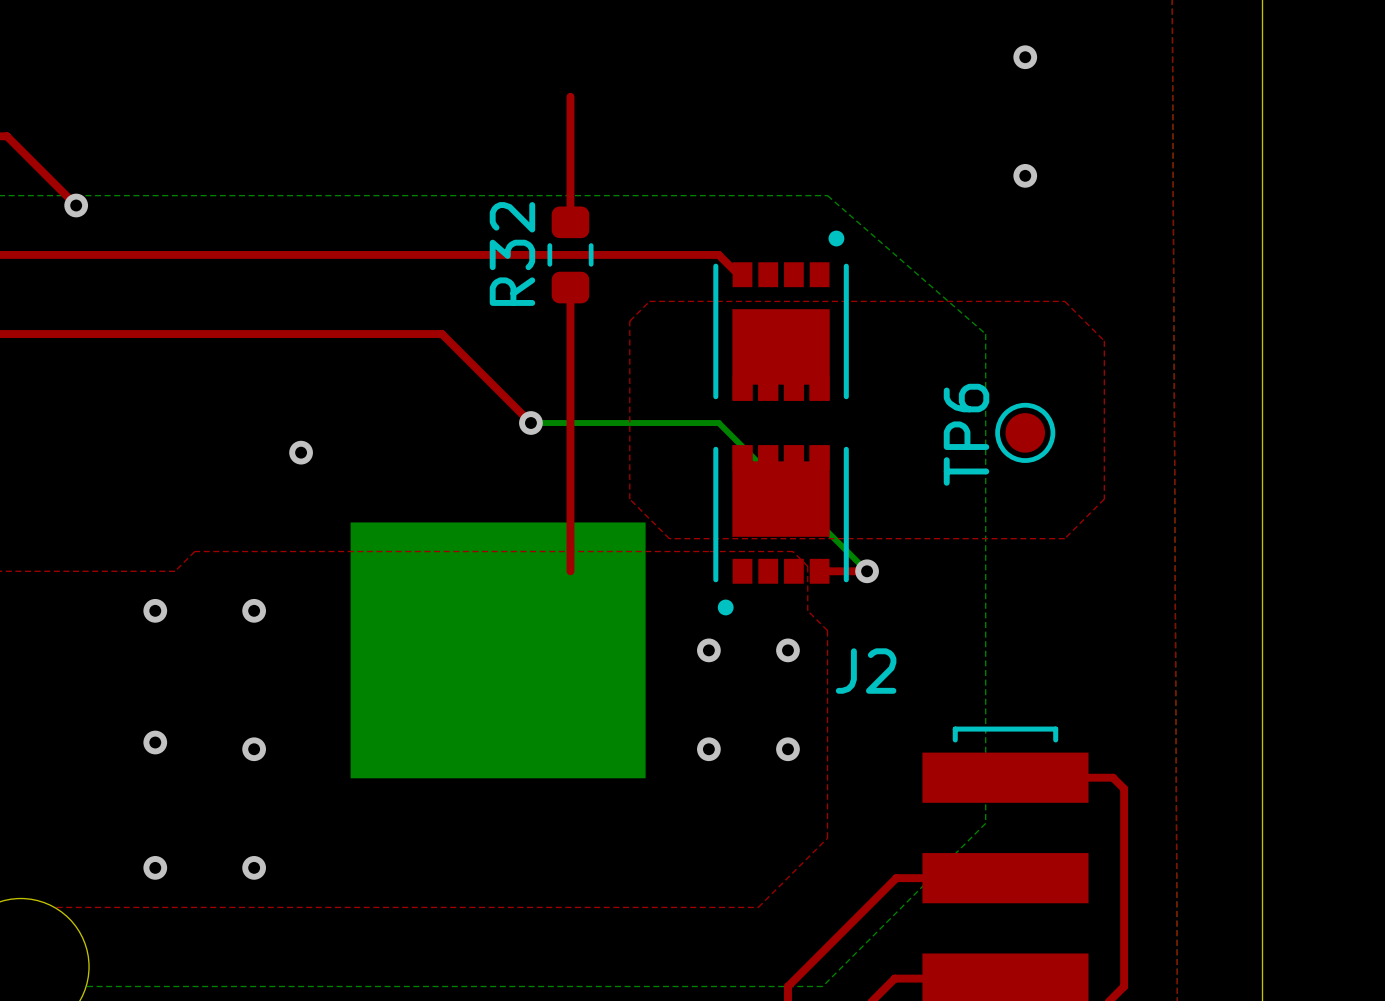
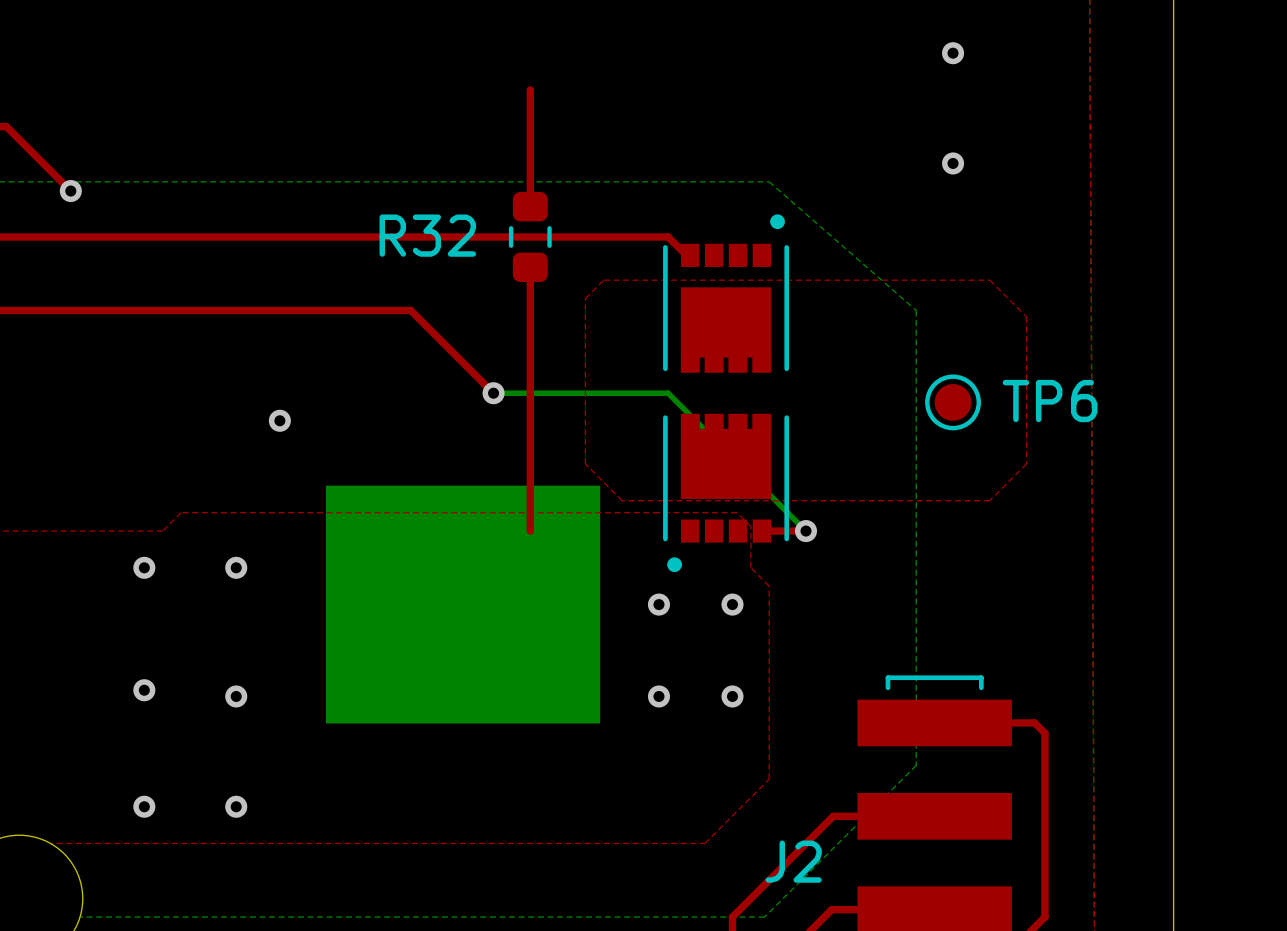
R32 name rotation: 0° (512, 253) -> 90° clockwise (427, 235)
TP6 name rotation: 0° (966, 434) -> 90° clockwise (1050, 401)
TP6 name position: TP6 (966, 434) -> TP6 (1050, 401)
J2 name position: J2 (866, 671) -> J2 (793, 861)

